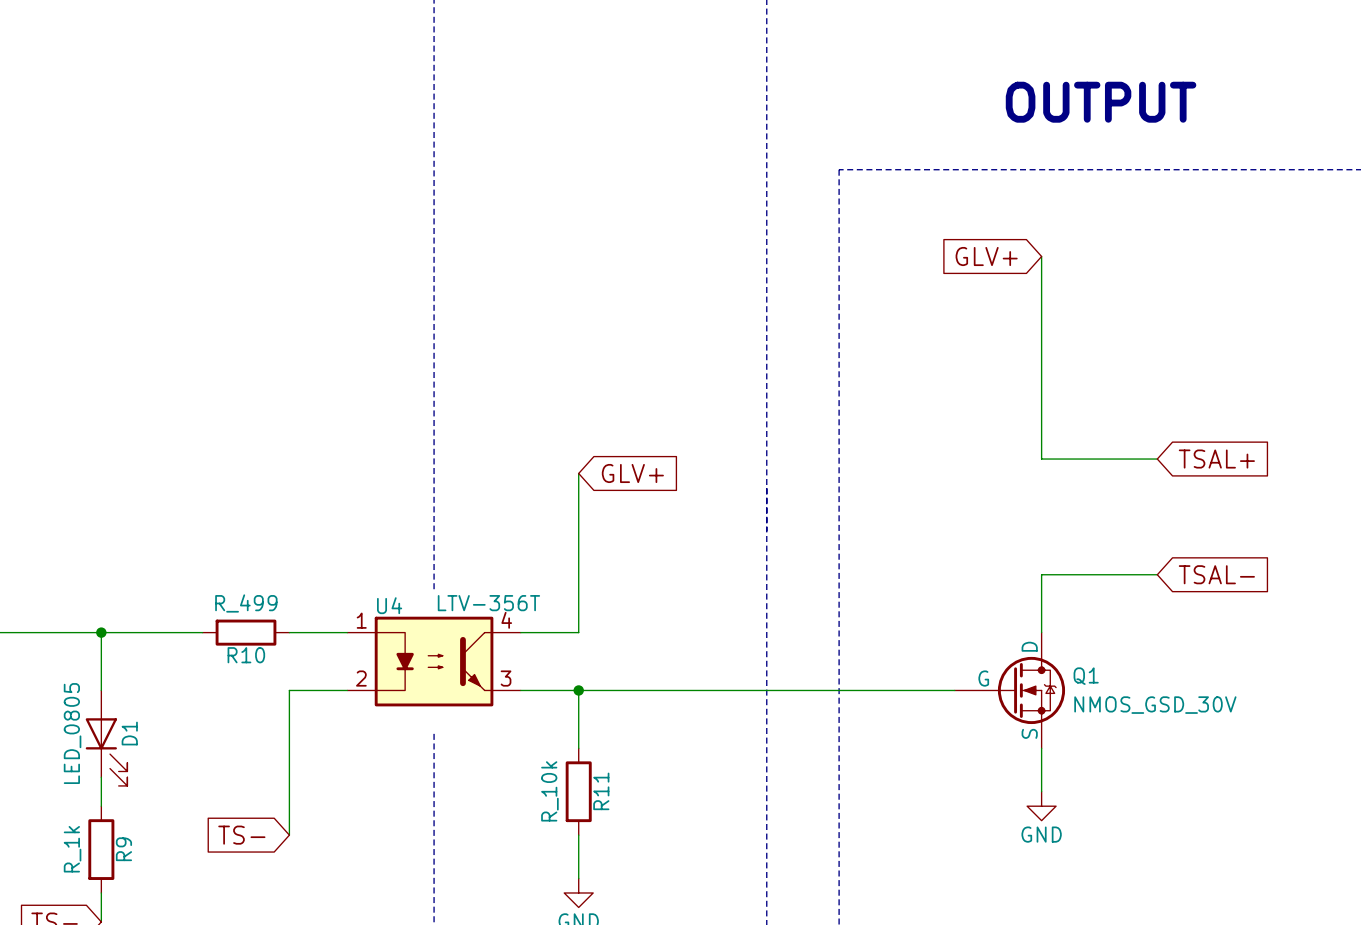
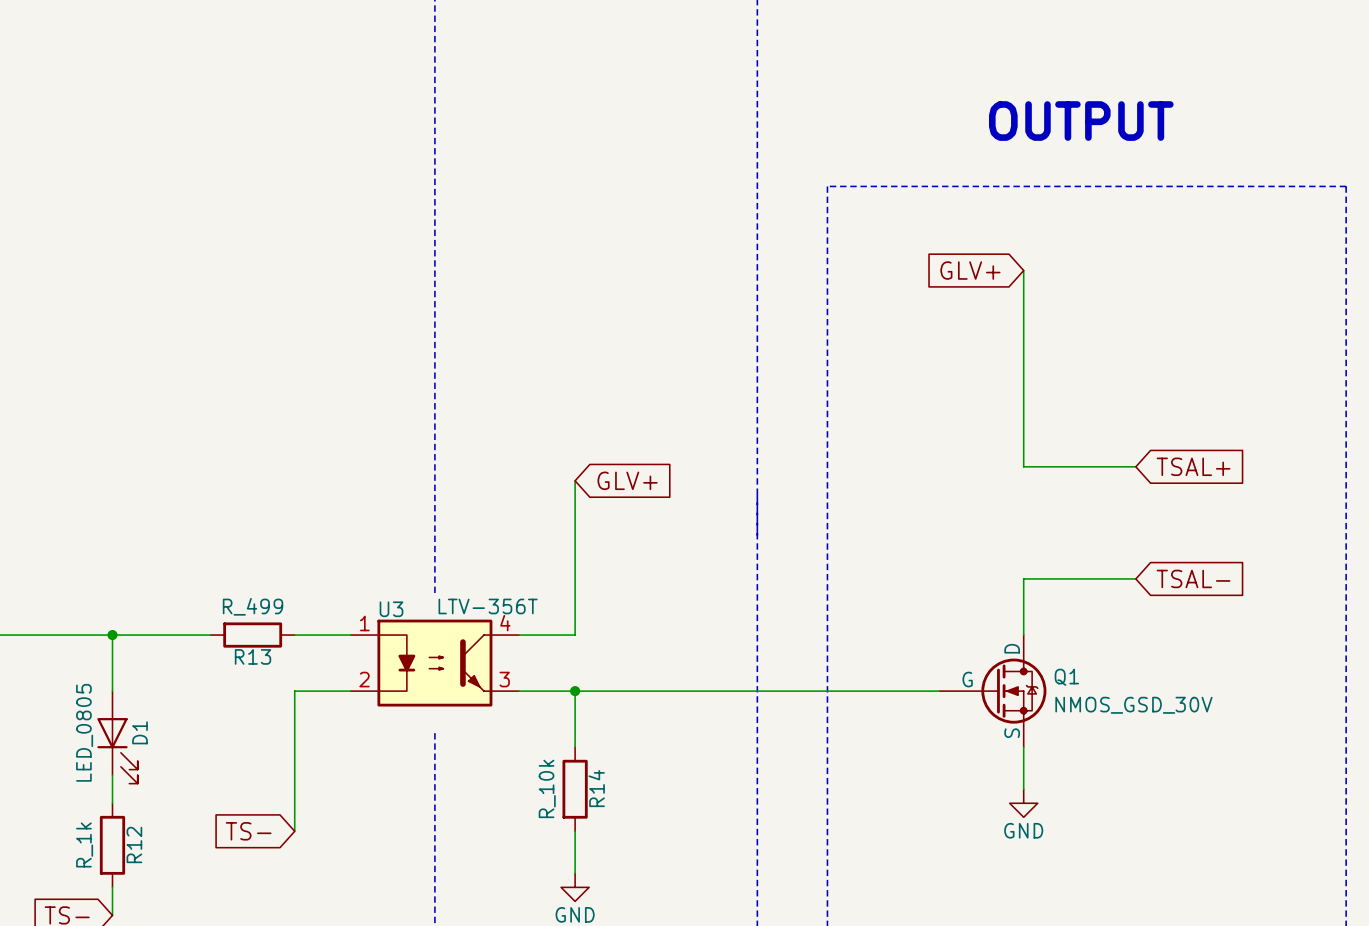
U4 name: U4 (389, 605) -> U3 (391, 609)
R10 name: R10 (246, 655) -> R13 (253, 656)
R11 name: R11 (601, 791) -> R14 (596, 788)
R9 name: R9 (123, 849) -> R12 (134, 844)

